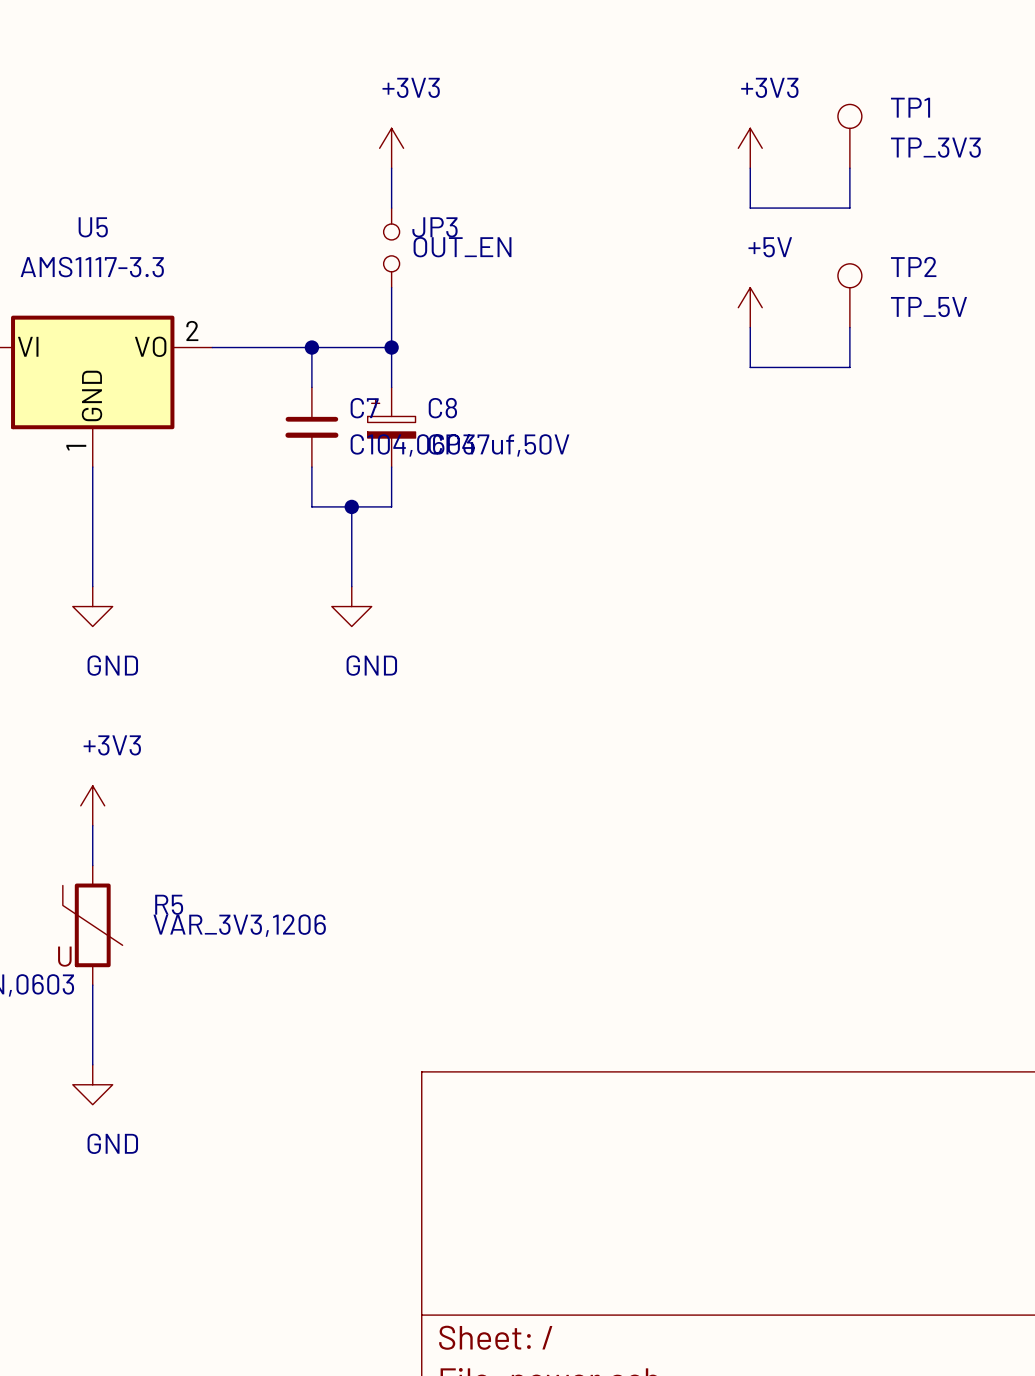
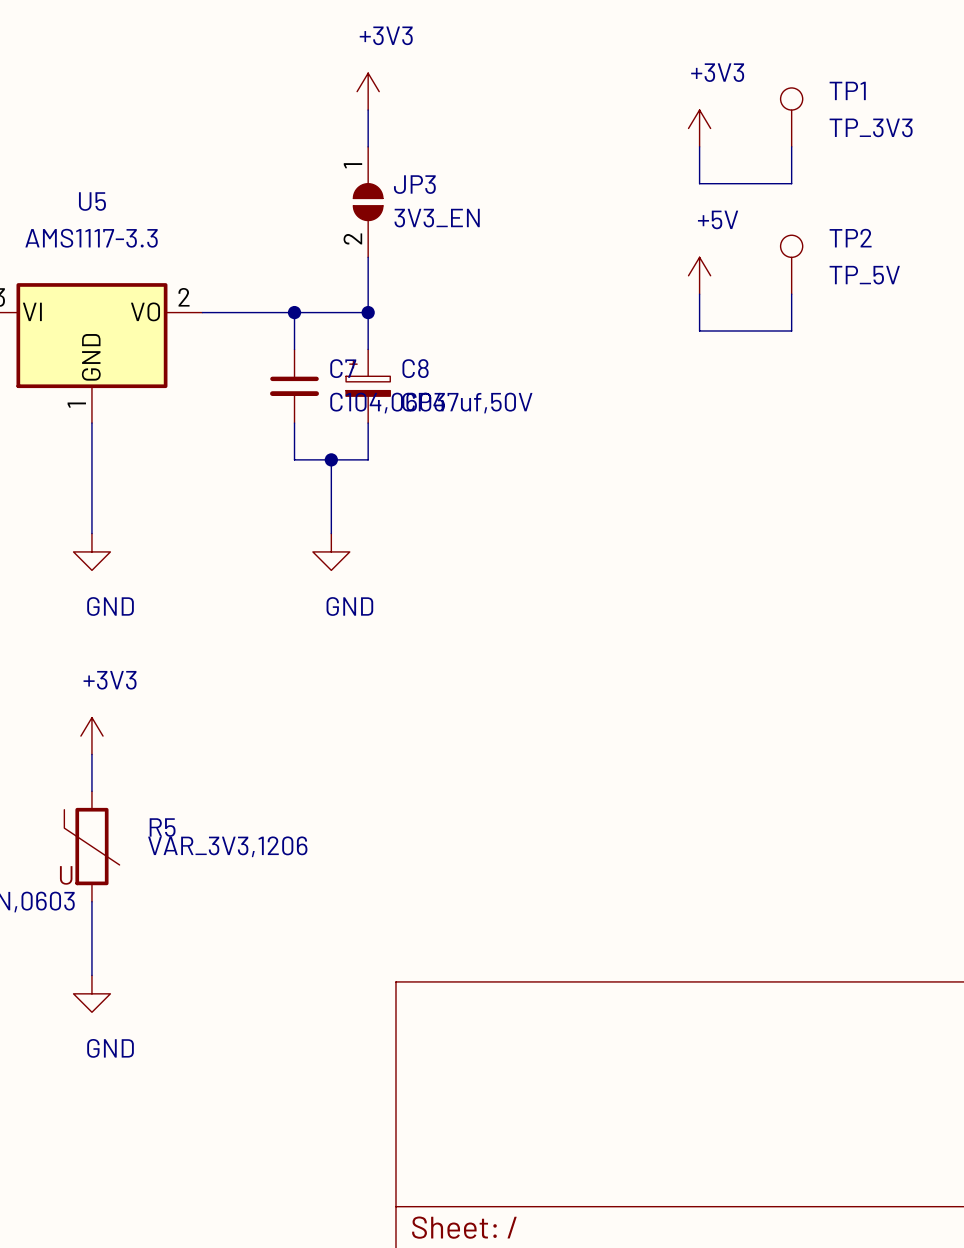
power symbol position: +3V3 (391, 148) -> +3V3 (368, 91)
JP3 symbol: [383, 208, 400, 288] -> [353, 146, 383, 258]
JP3 value: OUT_EN (462, 247) -> 3V3_EN (437, 218)

